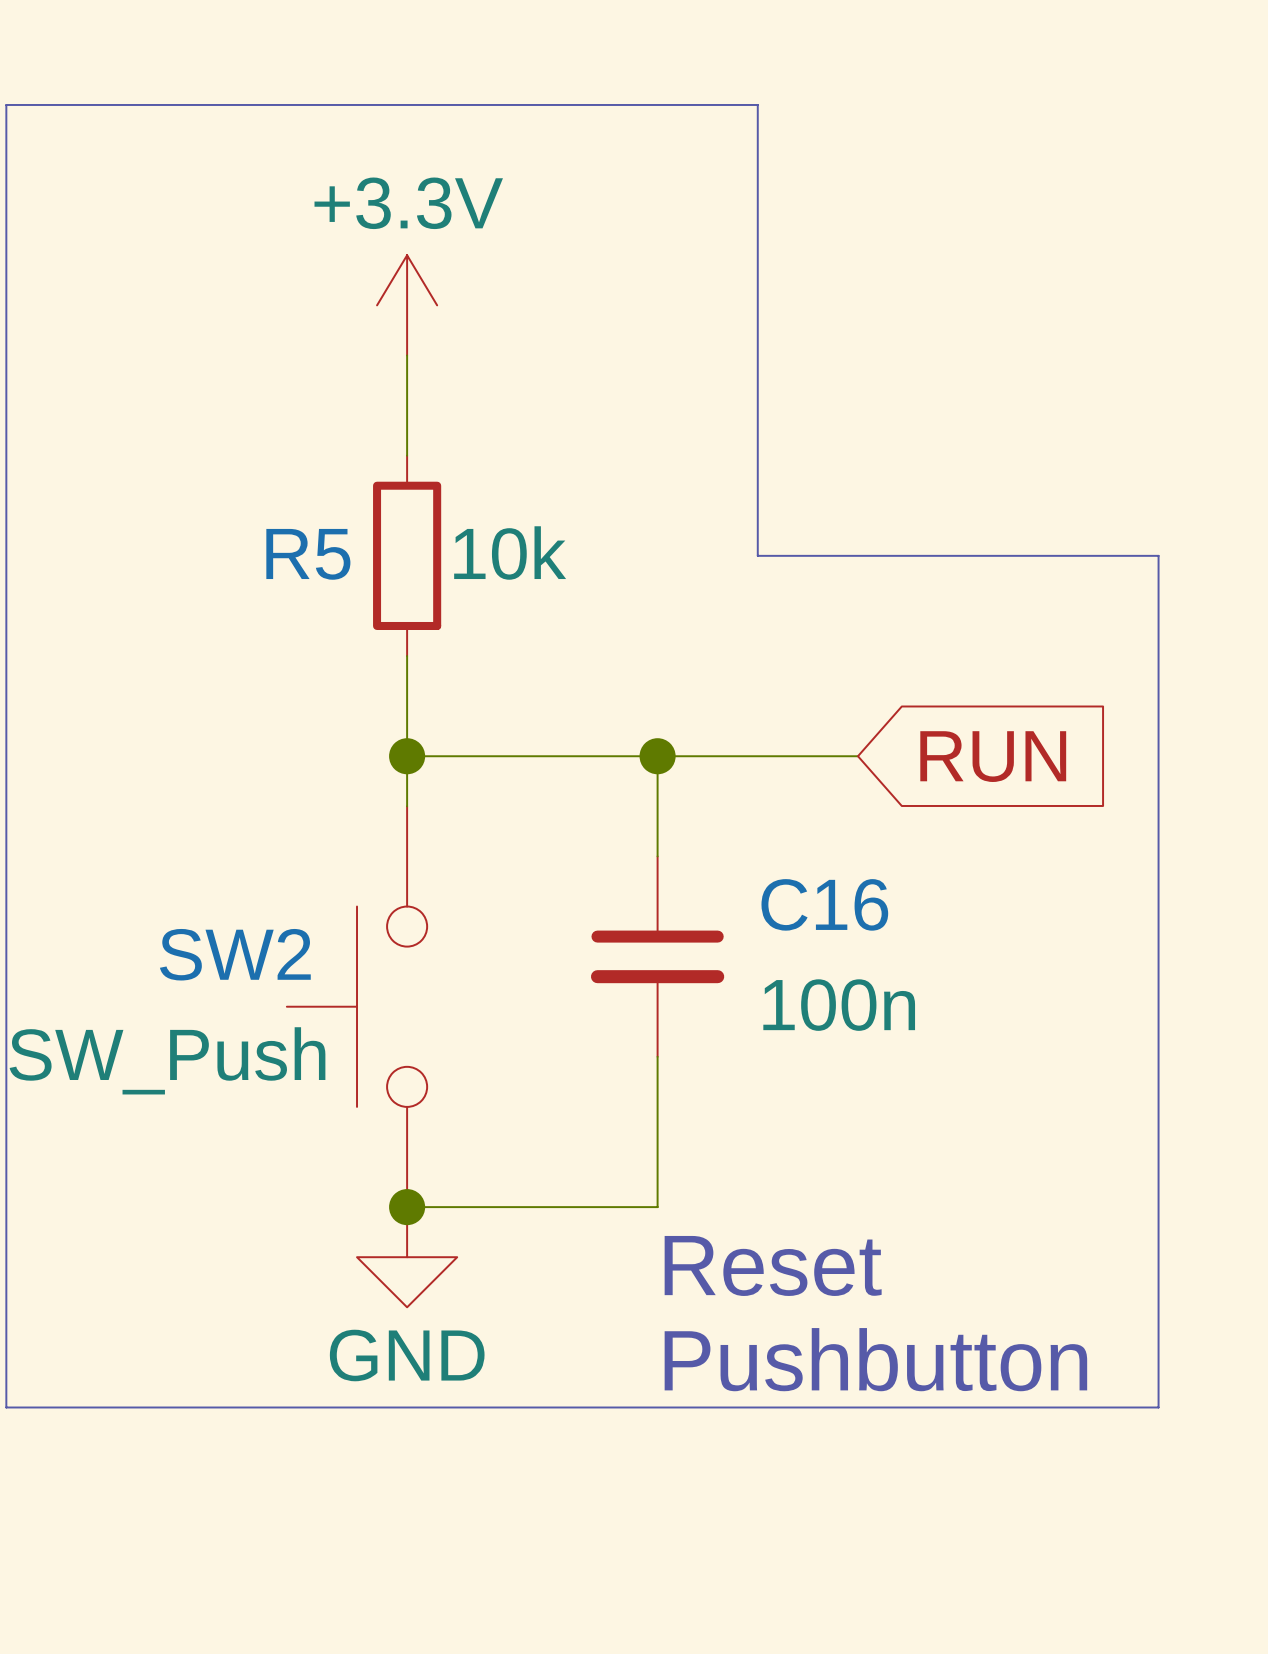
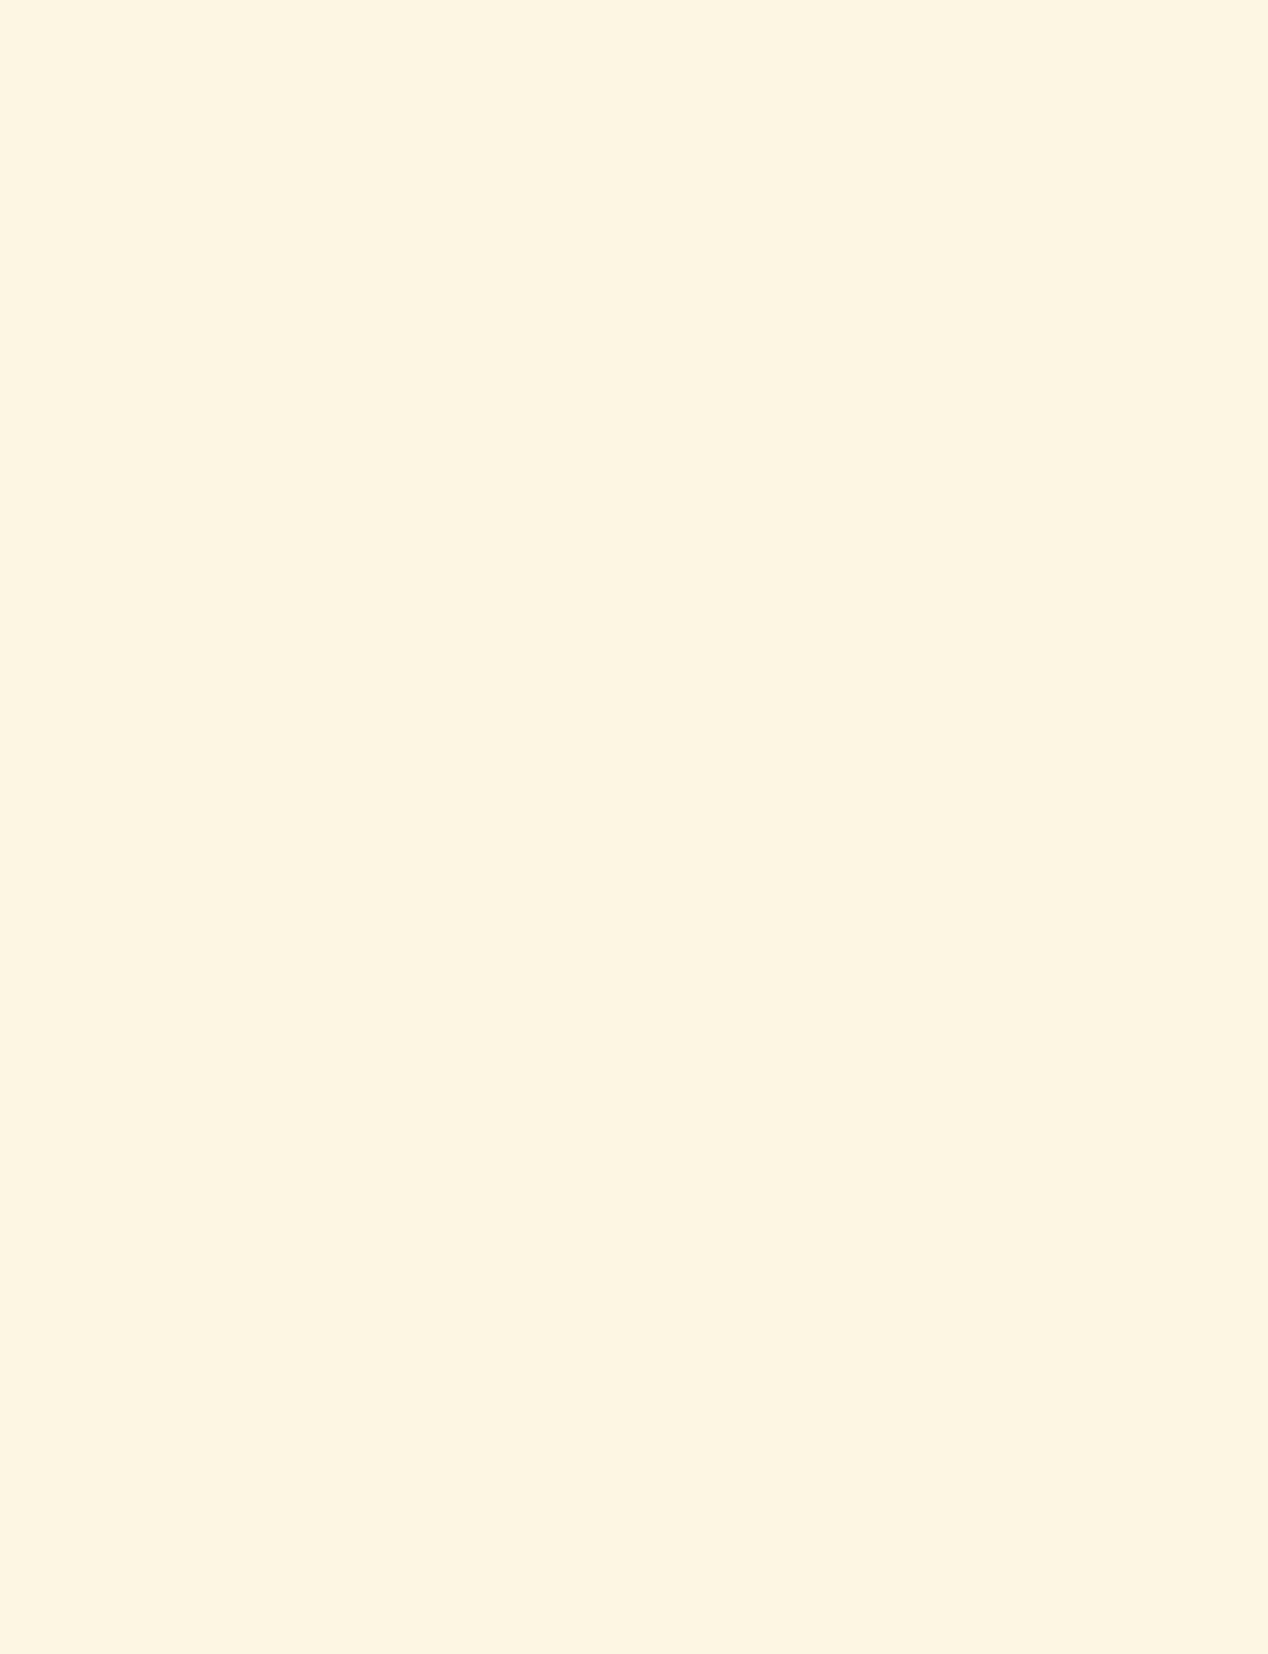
line: (6, 104) (757, 104) (757, 555) (1158, 555) (1158, 1407) (6, 1407) (6, 104) -> none
power symbol: +3.3V (407, 305) -> none
wire: (407, 355) (407, 455) -> none
R5: 10k (407, 555) -> none
wire: (407, 656) (407, 806) -> none
wire: (407, 756) (857, 756) -> none
junction: (407, 756) -> none
wire: (657, 756) (657, 856) -> none
junction: (657, 756) -> none
global label: RUN (993, 756) -> none
C16: 100n (657, 956) -> none
SW2: SW_Push (357, 1006) -> none
wire: (657, 1056) (657, 1207) (407, 1207) -> none
junction: (407, 1207) -> none
power symbol: GND (407, 1257) -> none
text: Reset (773, 1265) -> none
text: Pushbutton (875, 1359) -> none

